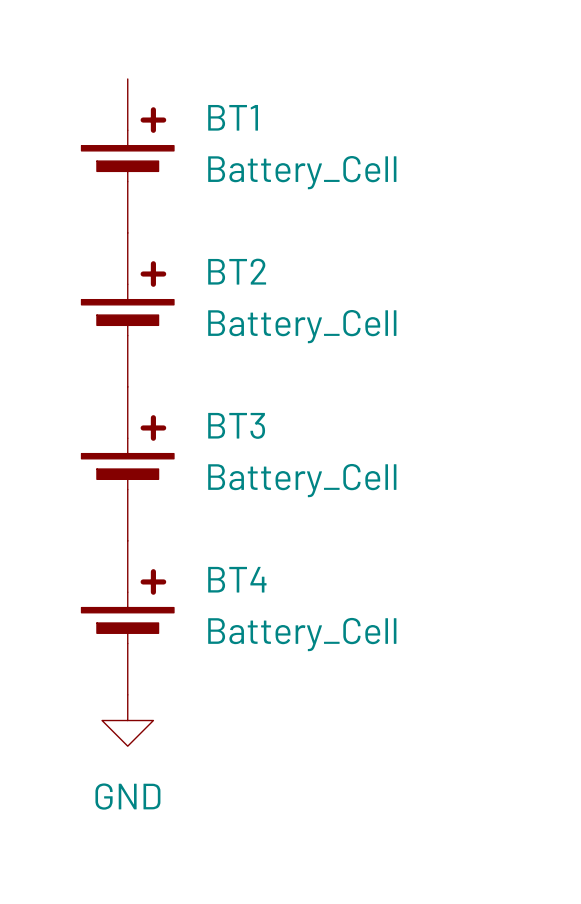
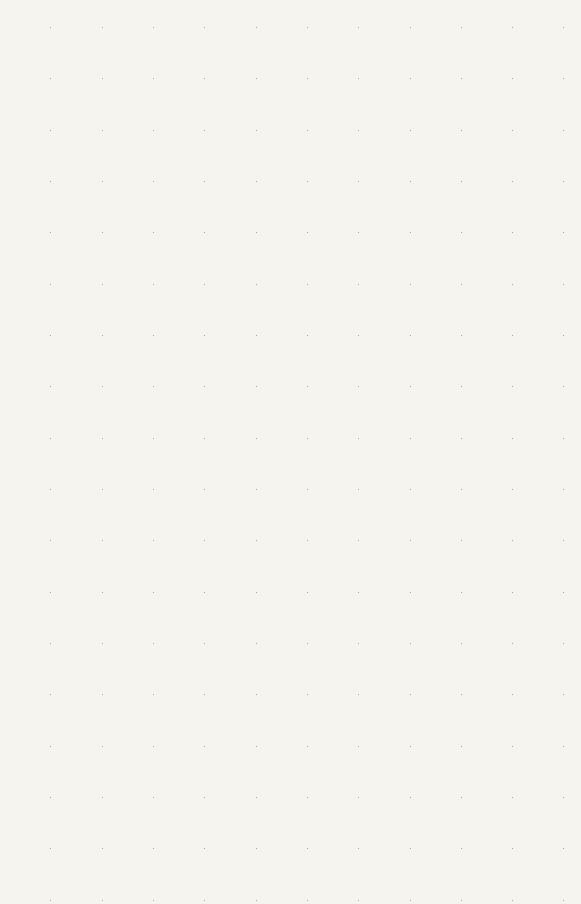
BT1: Battery_Cell (127, 155) -> none
BT2: Battery_Cell (127, 309) -> none
BT3: Battery_Cell (127, 463) -> none
BT4: Battery_Cell (127, 617) -> none
power symbol: GND (127, 720) -> none

